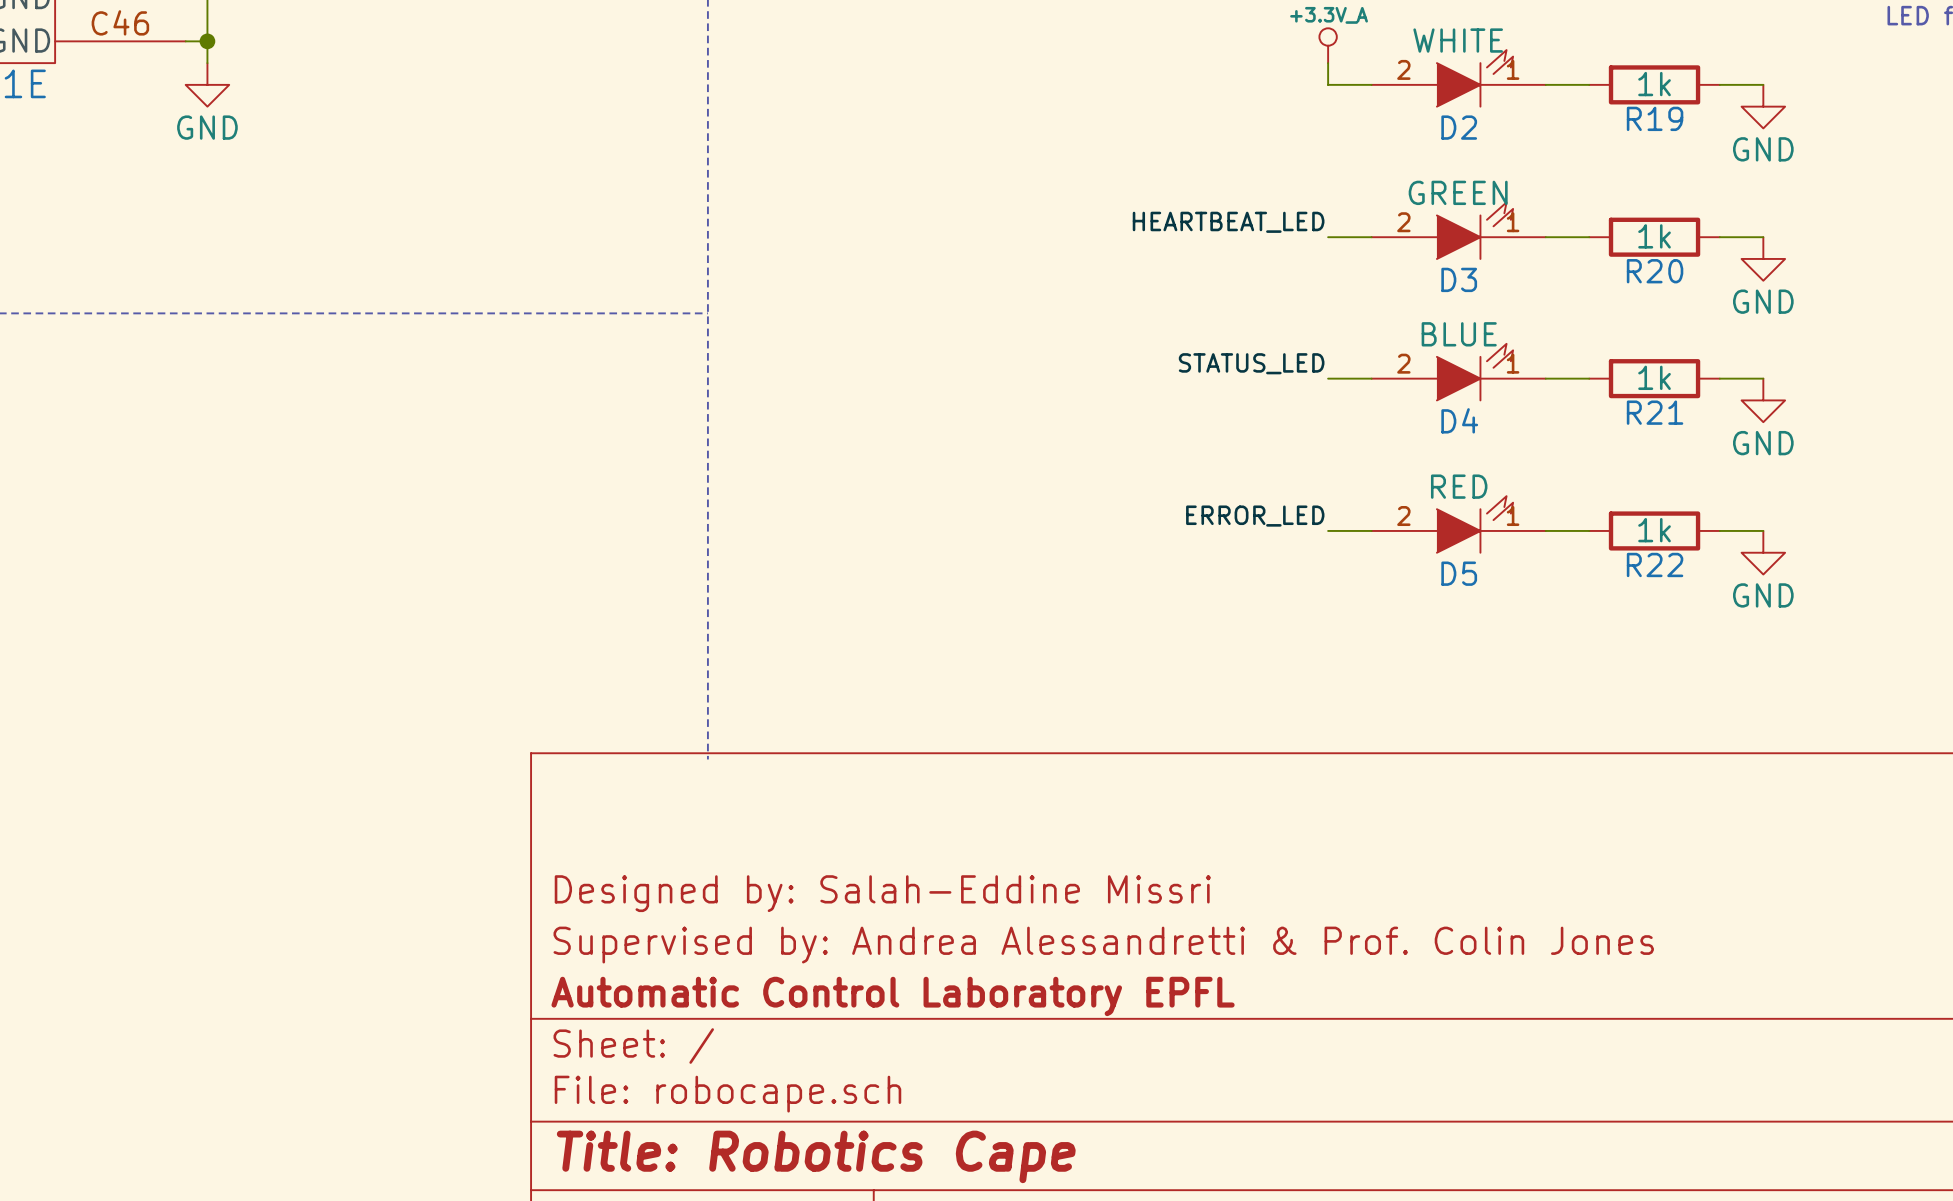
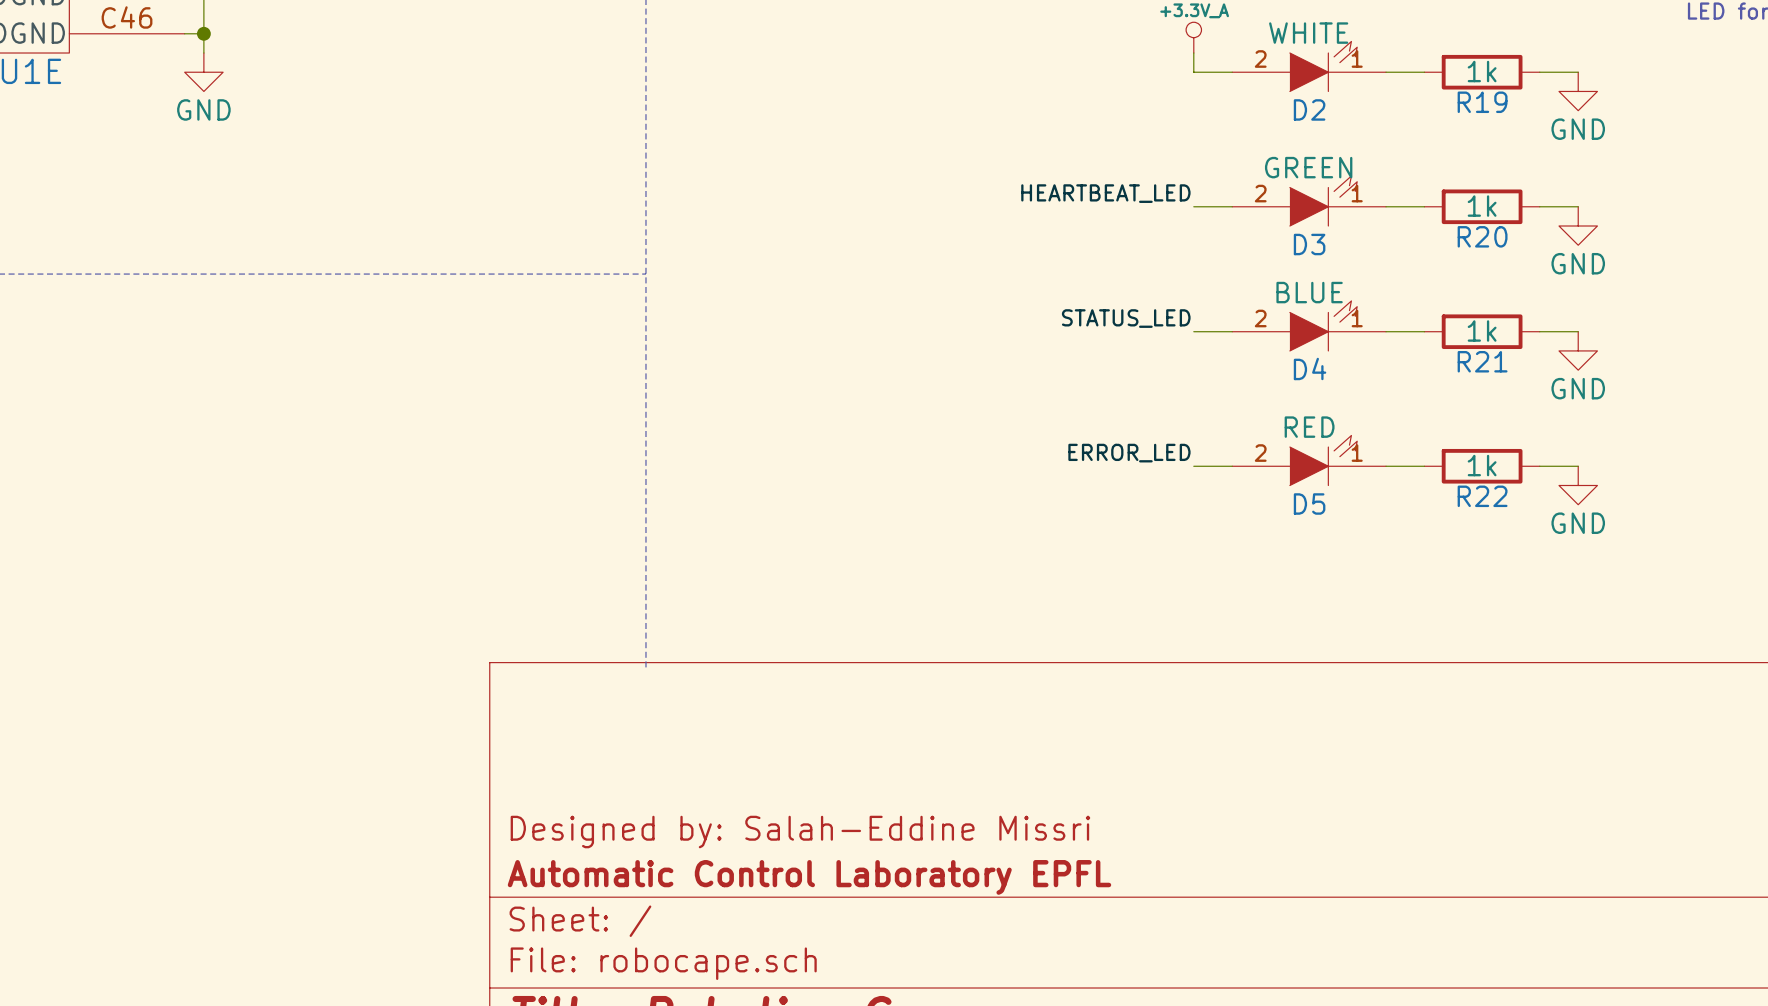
title block: Designed by: Salah-Eddine Missri (882, 893) -> none
title block: Supervised by: Andrea Alessandretti & Prof. Colin Jones (1103, 945) -> Designed by: Salah-Eddine Missri (800, 832)

